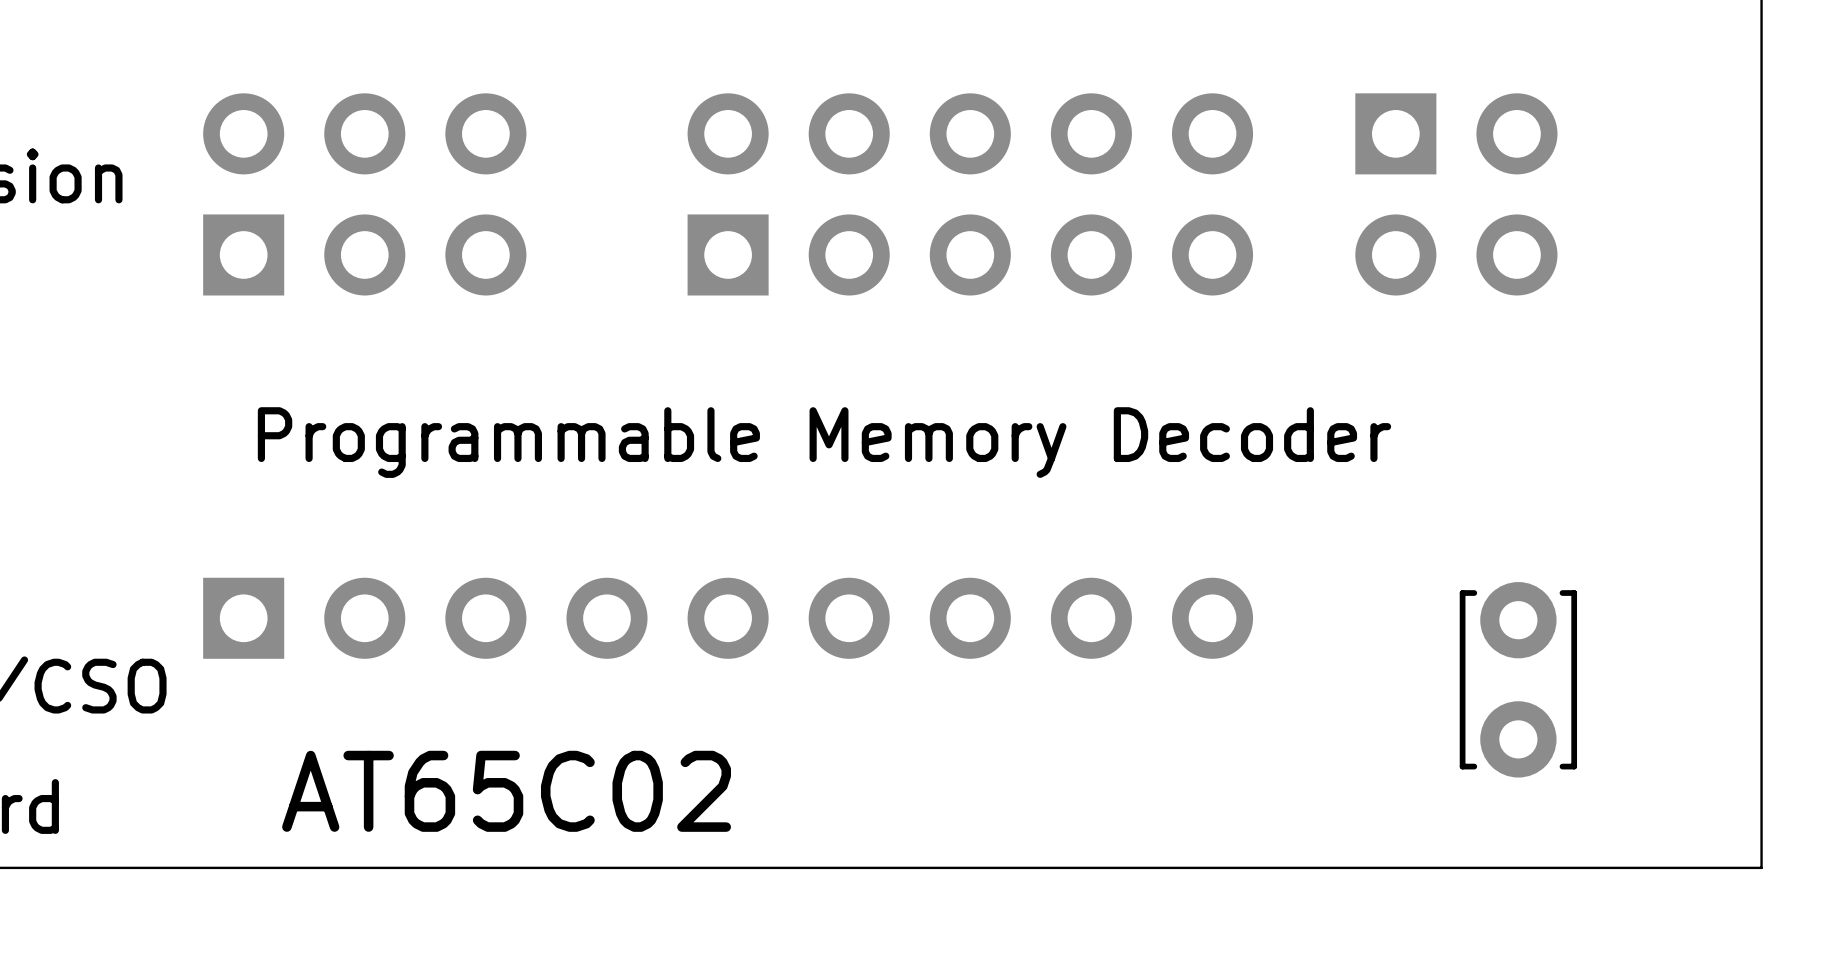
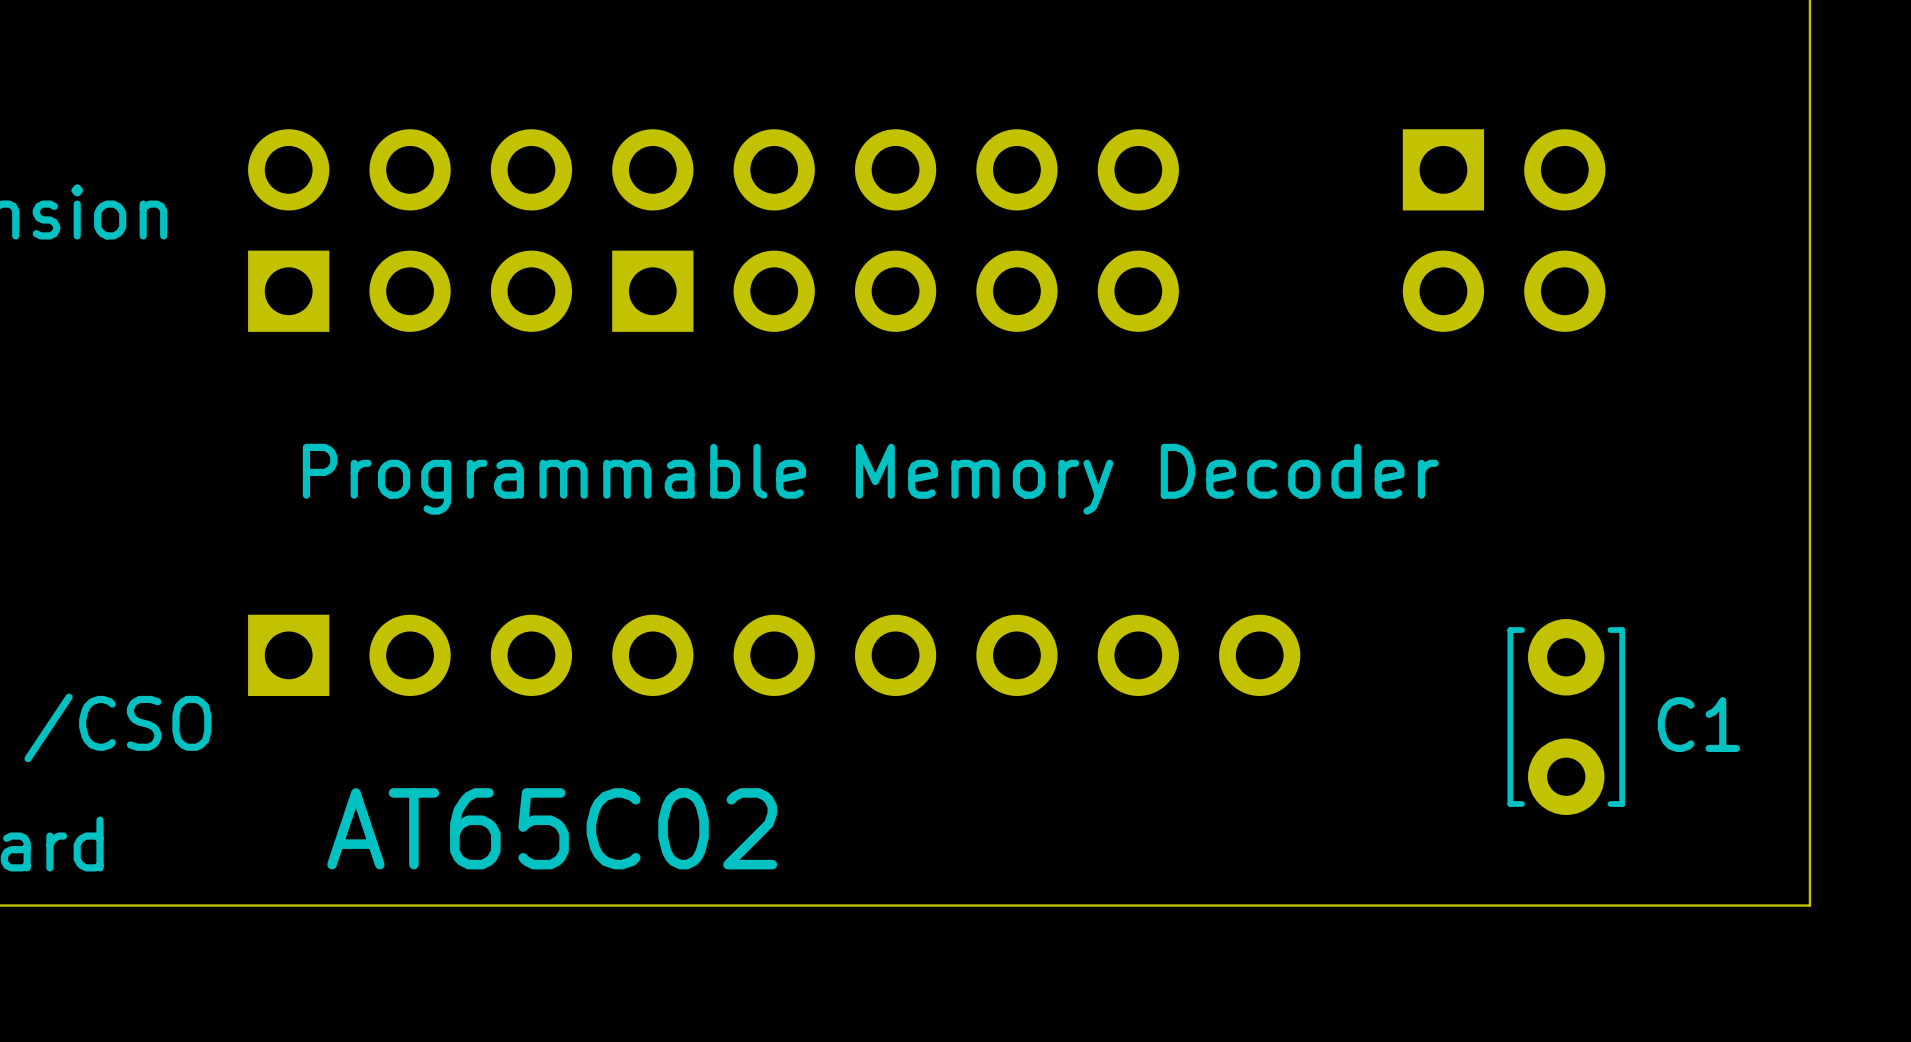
part position: (970, 194) -> (895, 230)
text: none -> C1 (1698, 724)

